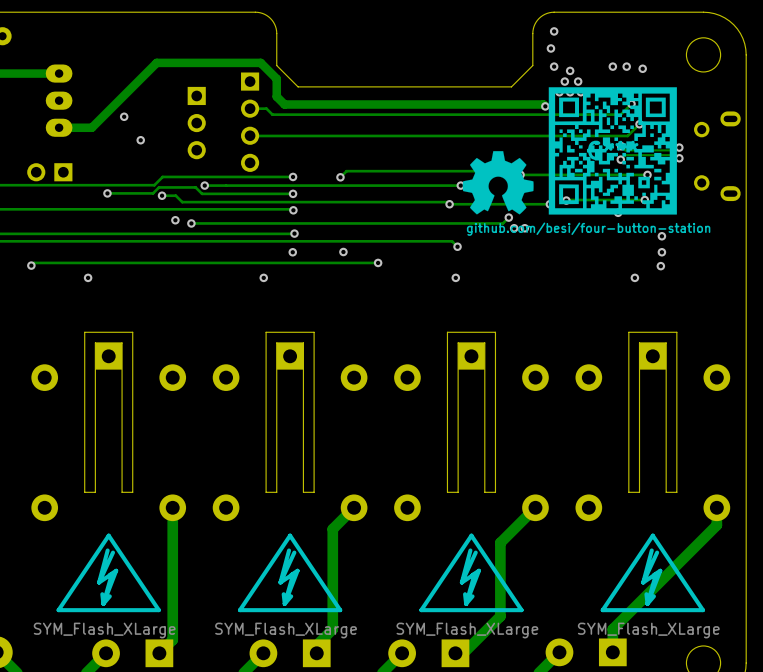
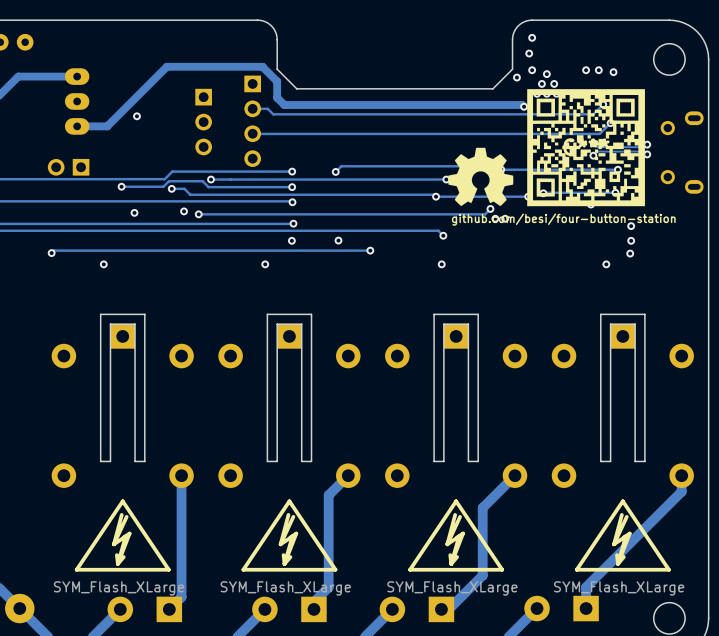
via: none -> (516, 77)
via: (140, 140) -> none
via: none -> (134, 212)

